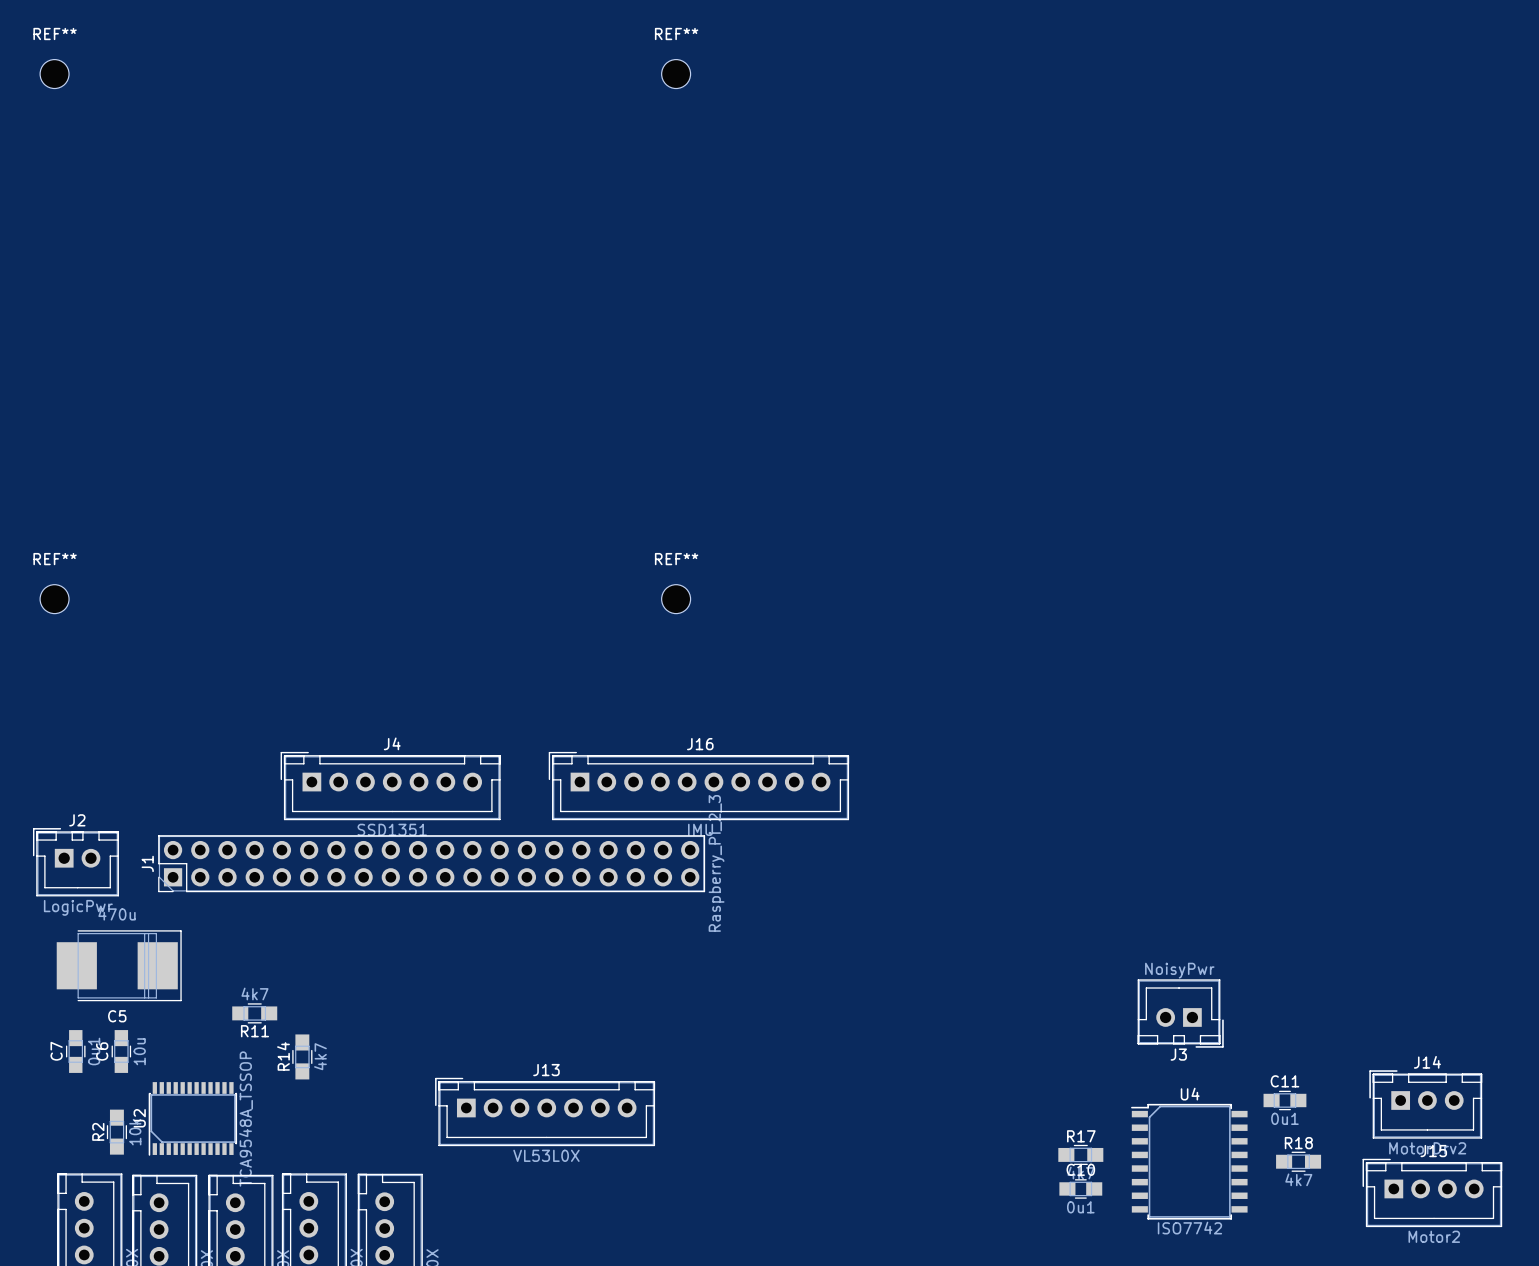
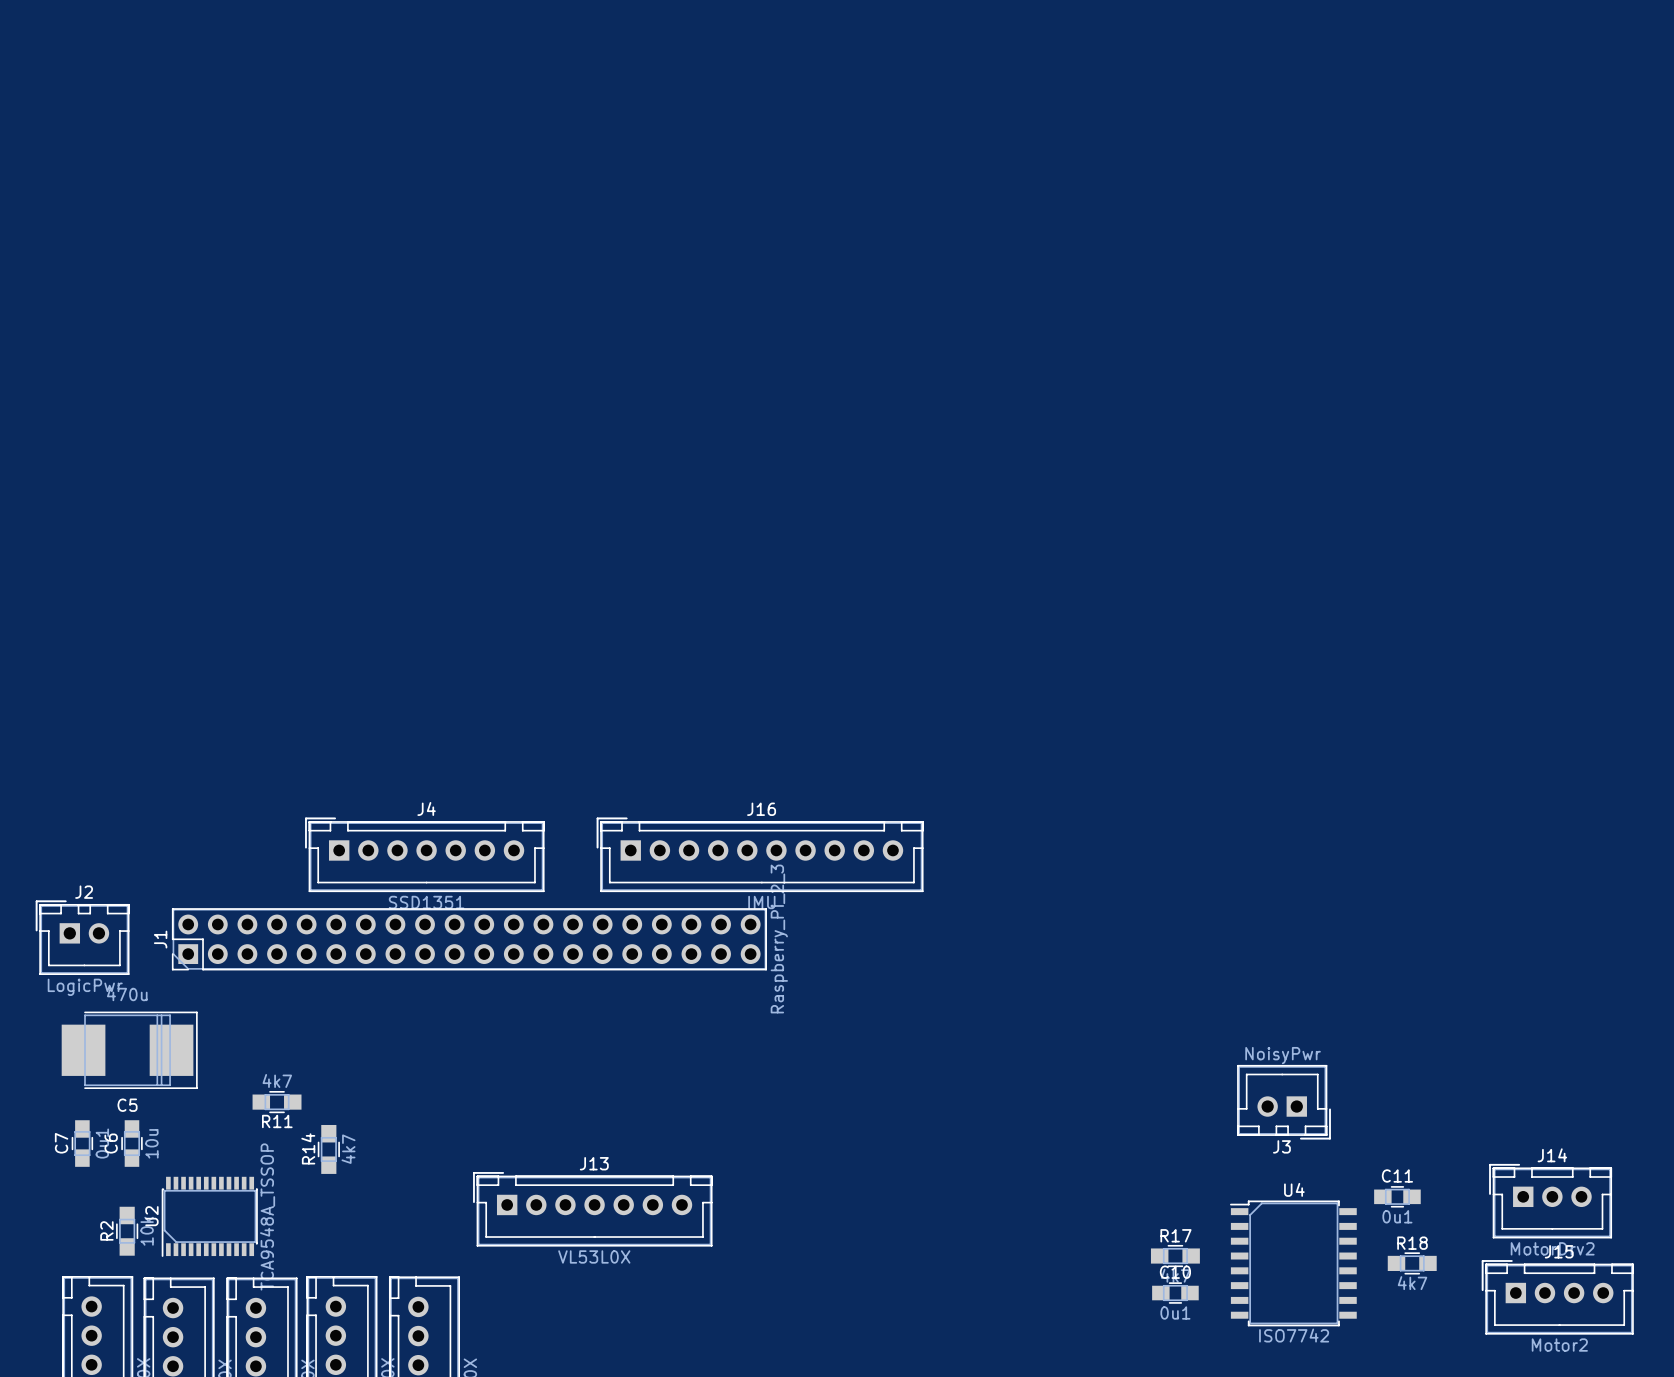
REF**: (54, 74) -> none
REF**: (676, 74) -> none
REF**: (54, 599) -> none
REF**: (676, 599) -> none

